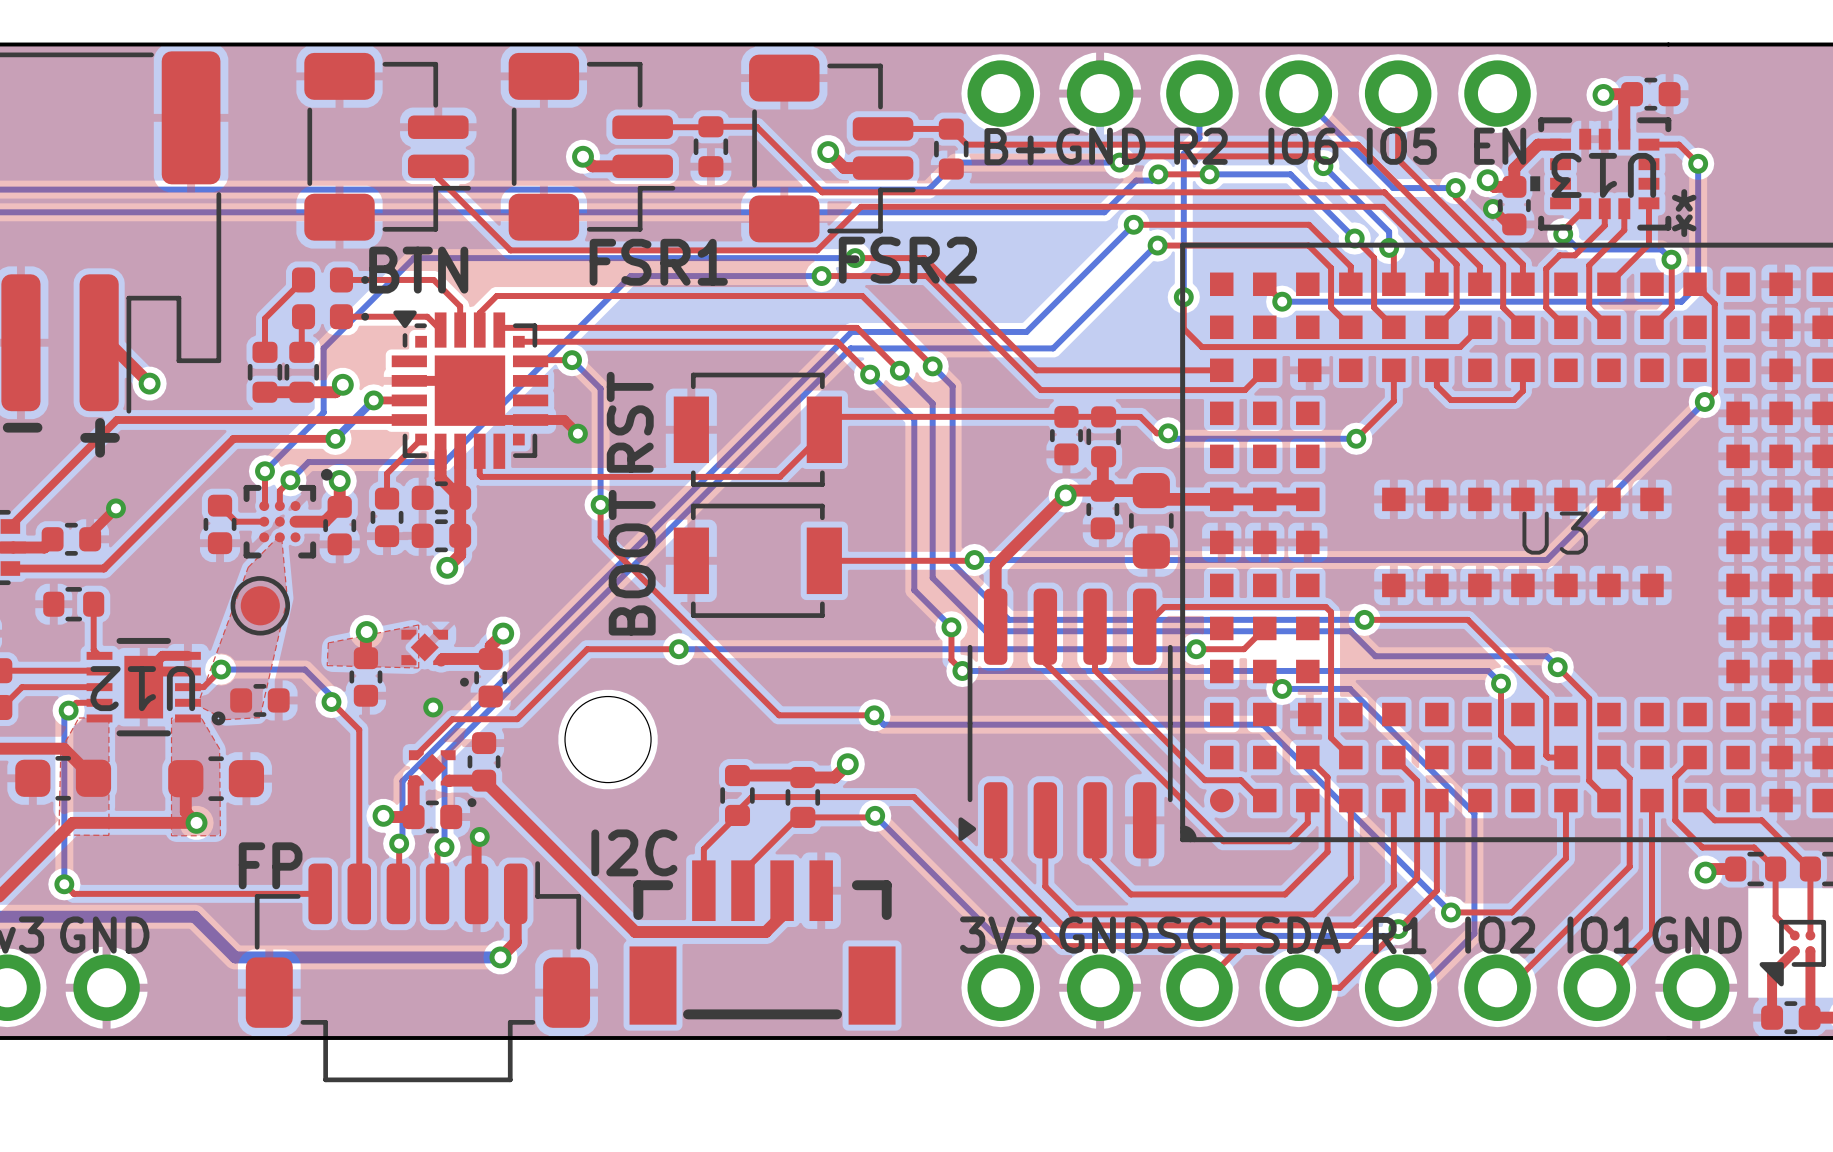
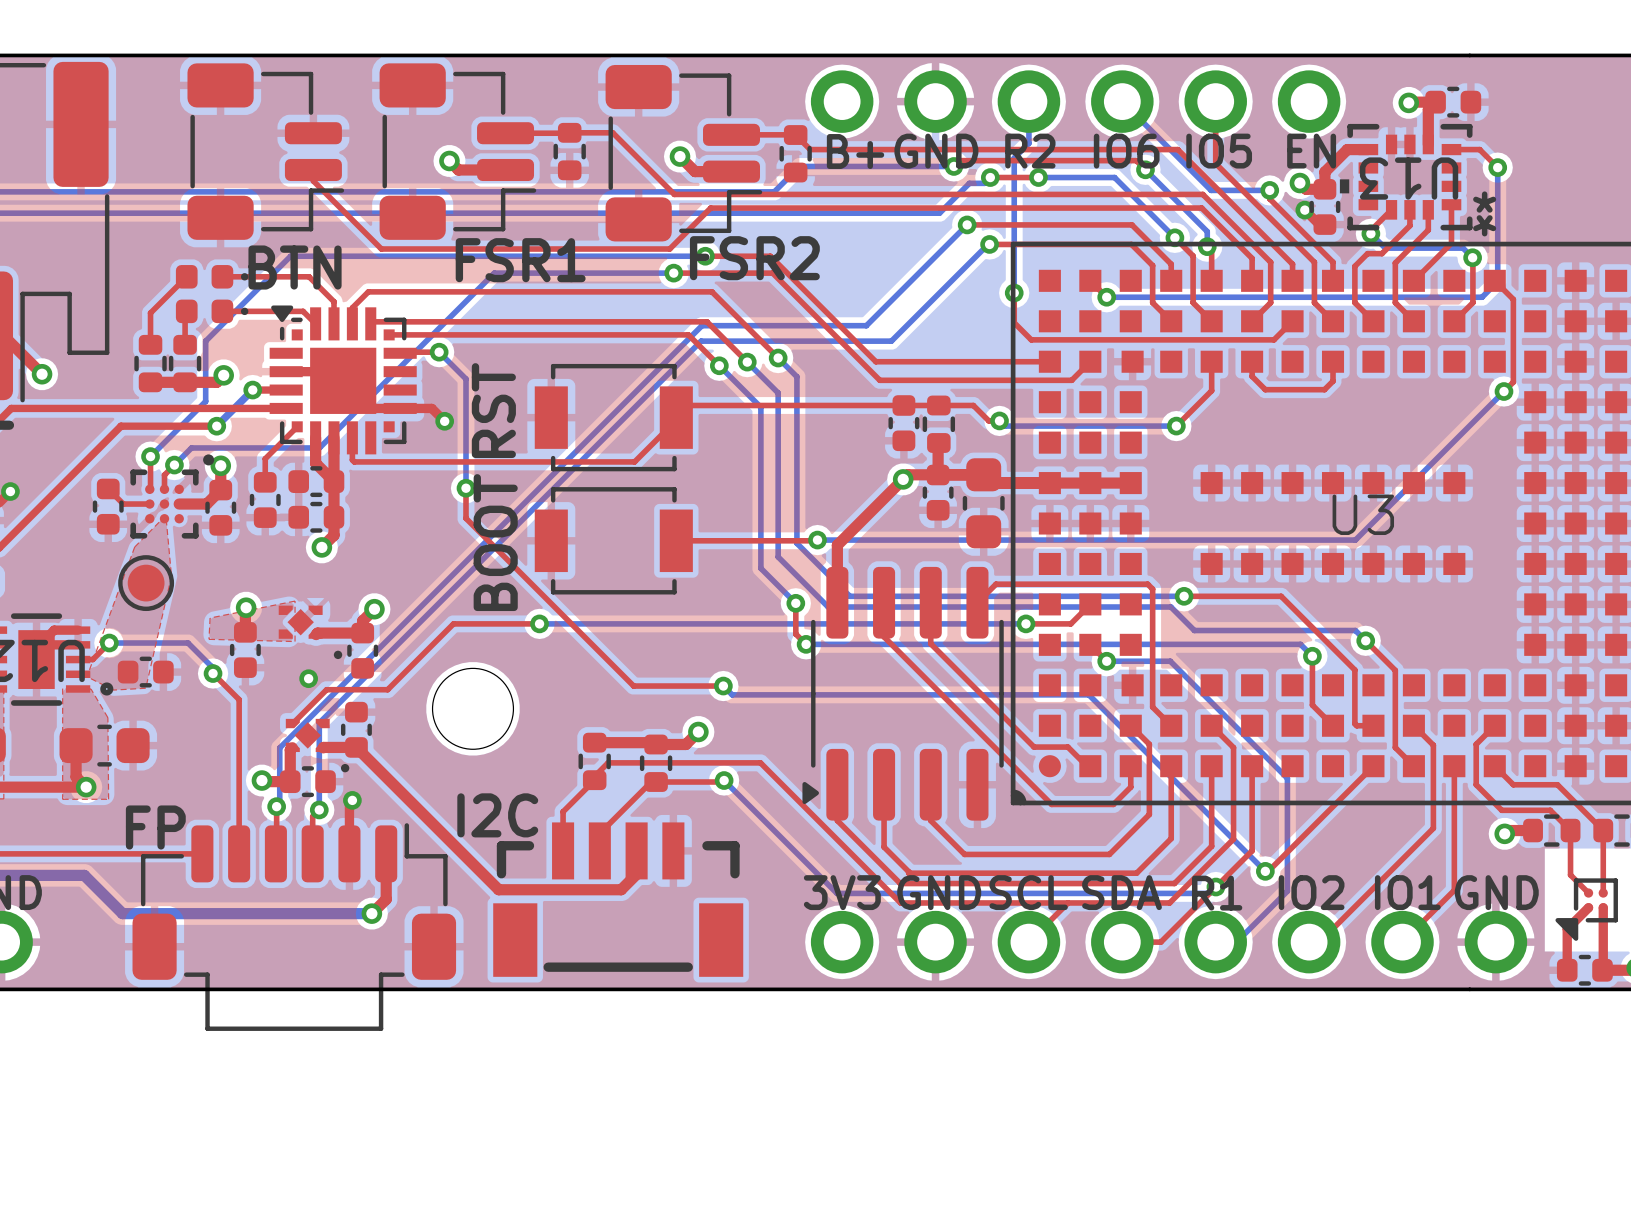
top track: (1565, 800) (1565, 858) (1511, 912) (1454, 912) -> (1373, 766) (1268, 871)

